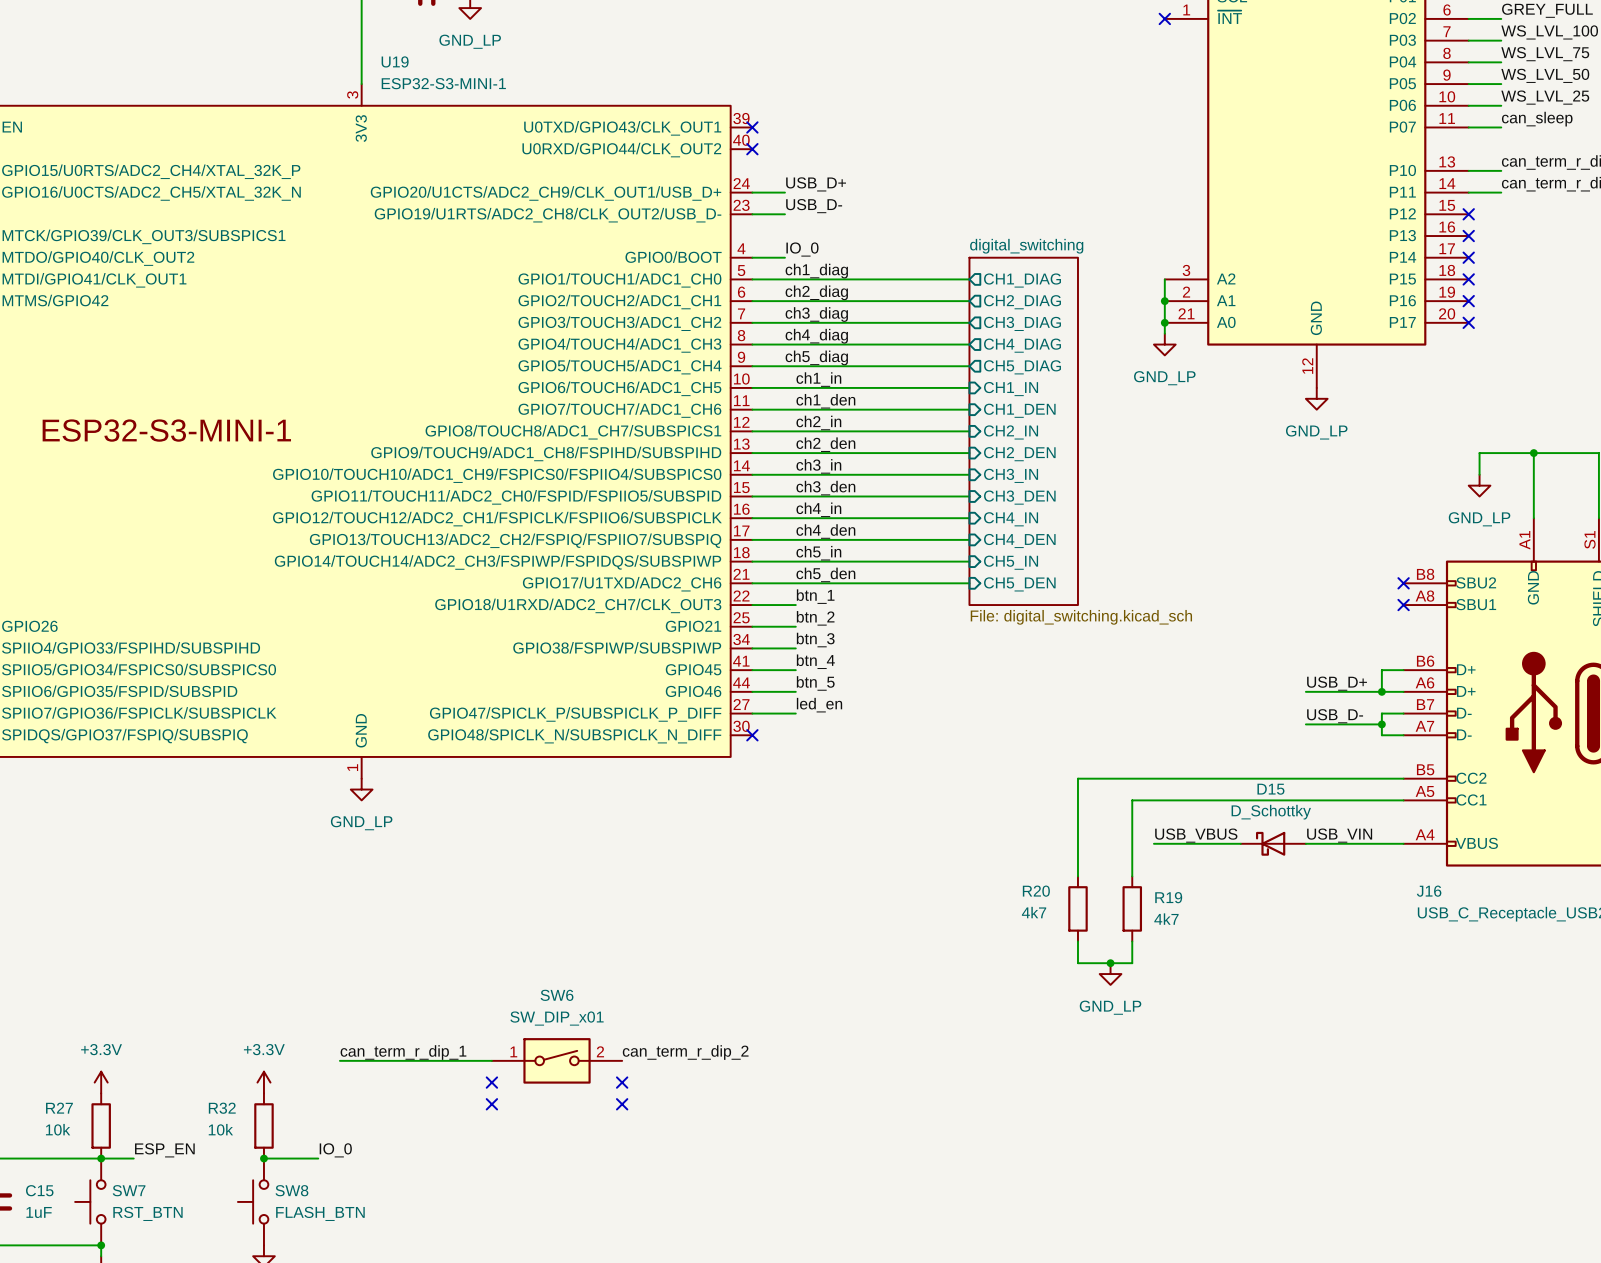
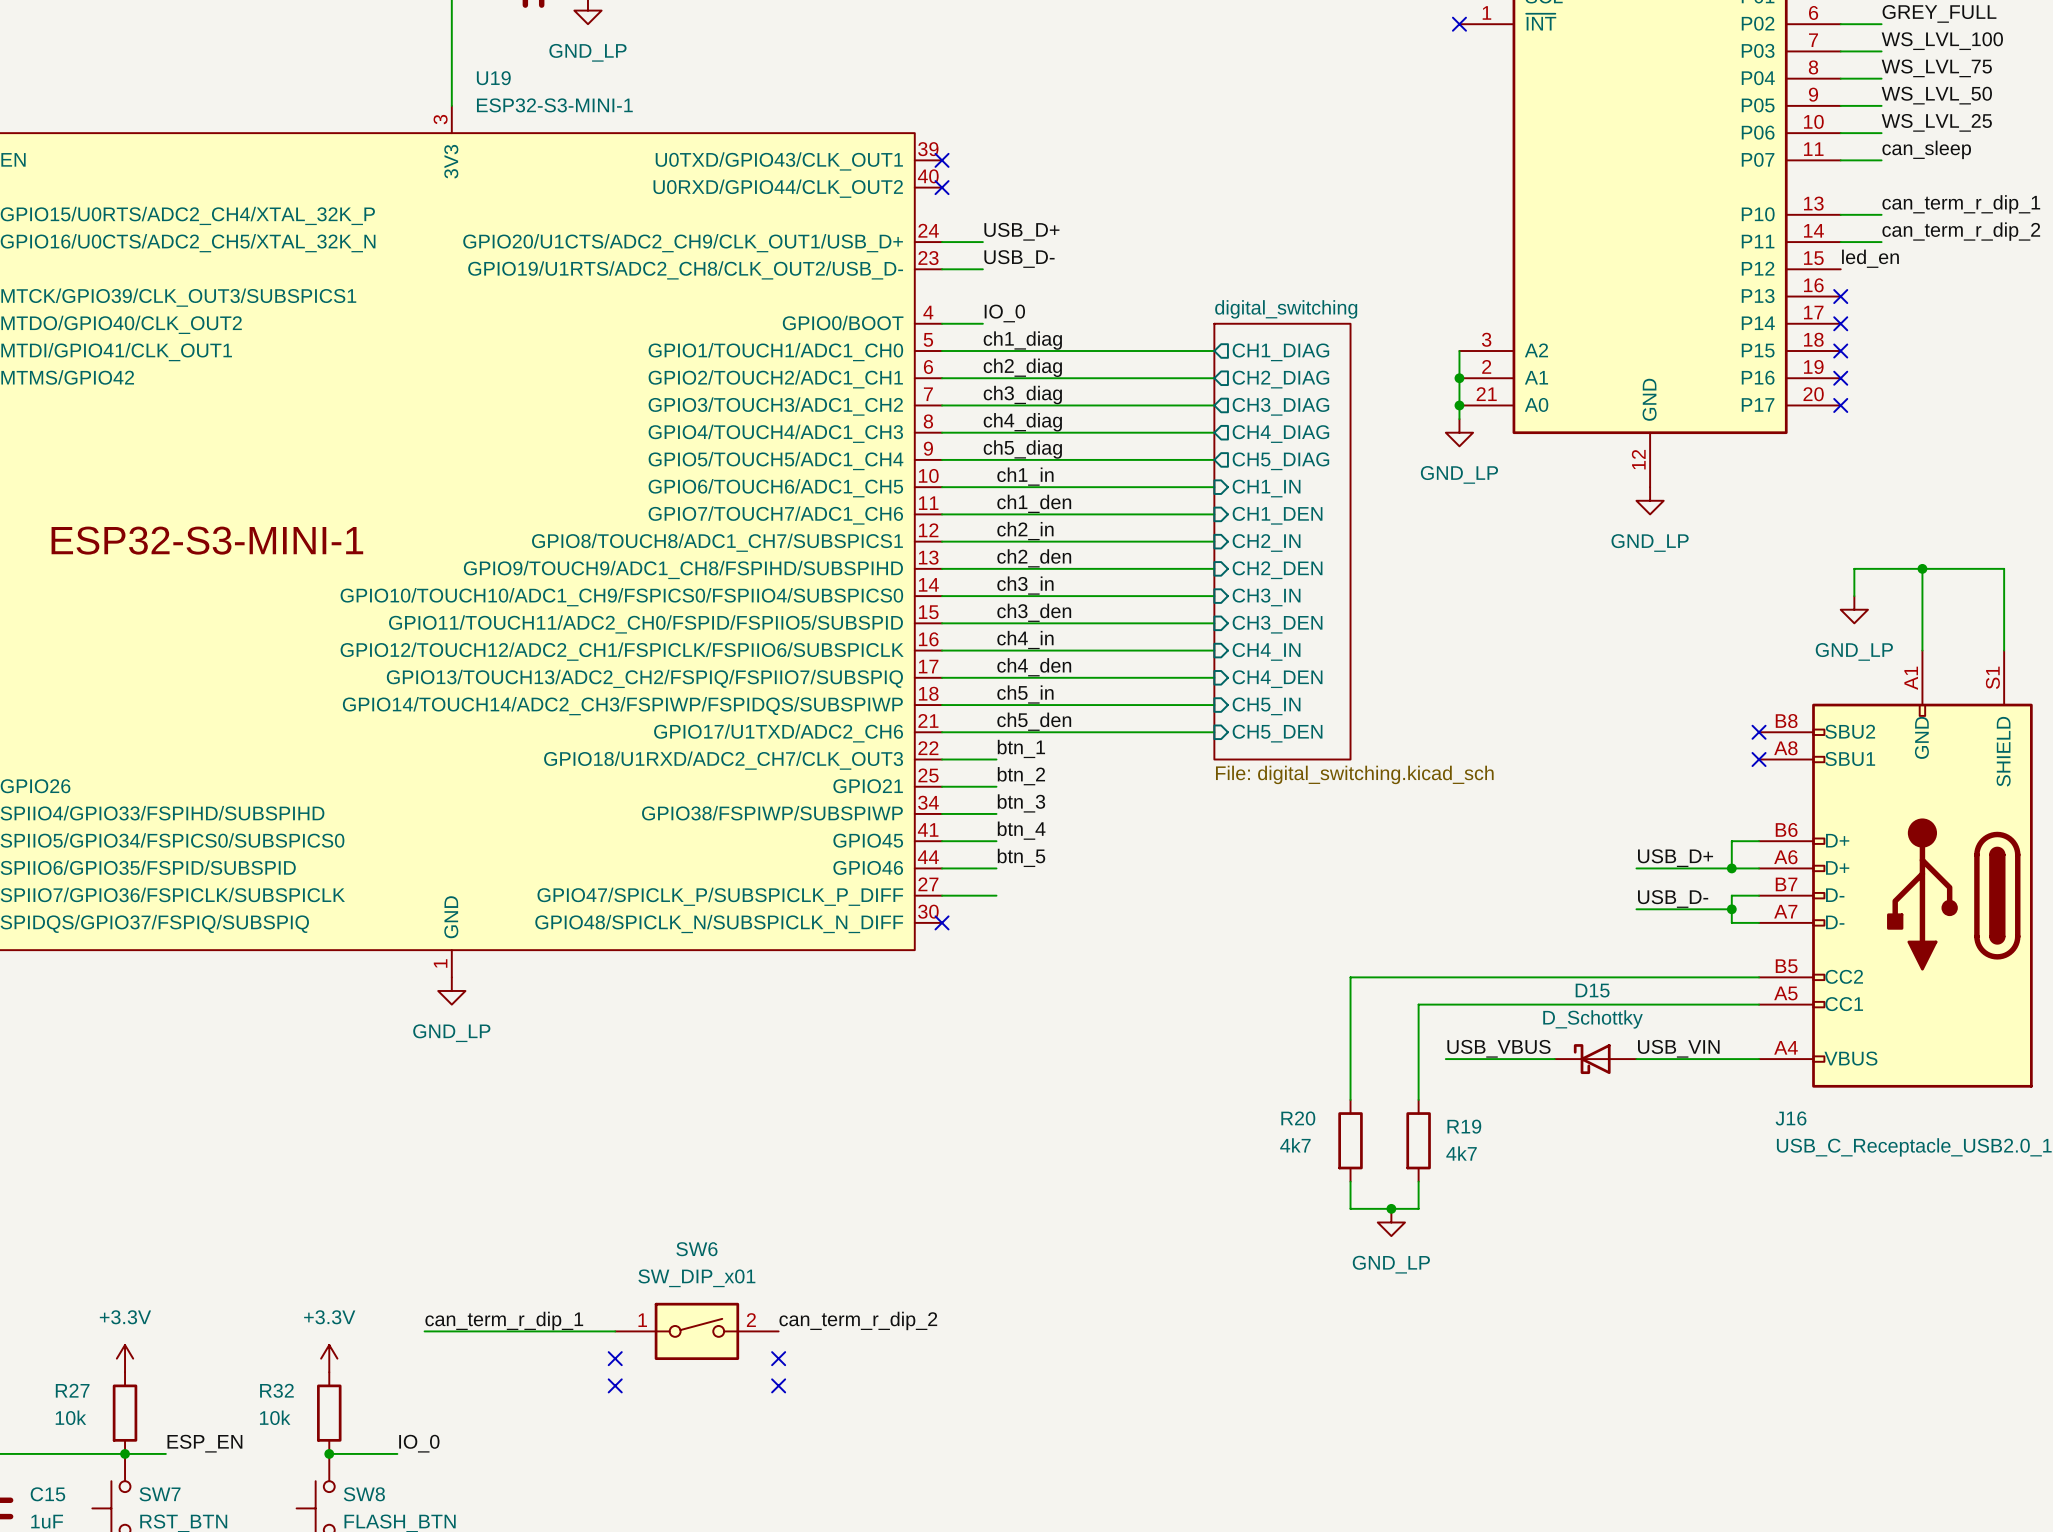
label: none -> led_en (1870, 258)
no-connect mark: (1468, 214) -> none
label: led_en (819, 705) -> none

